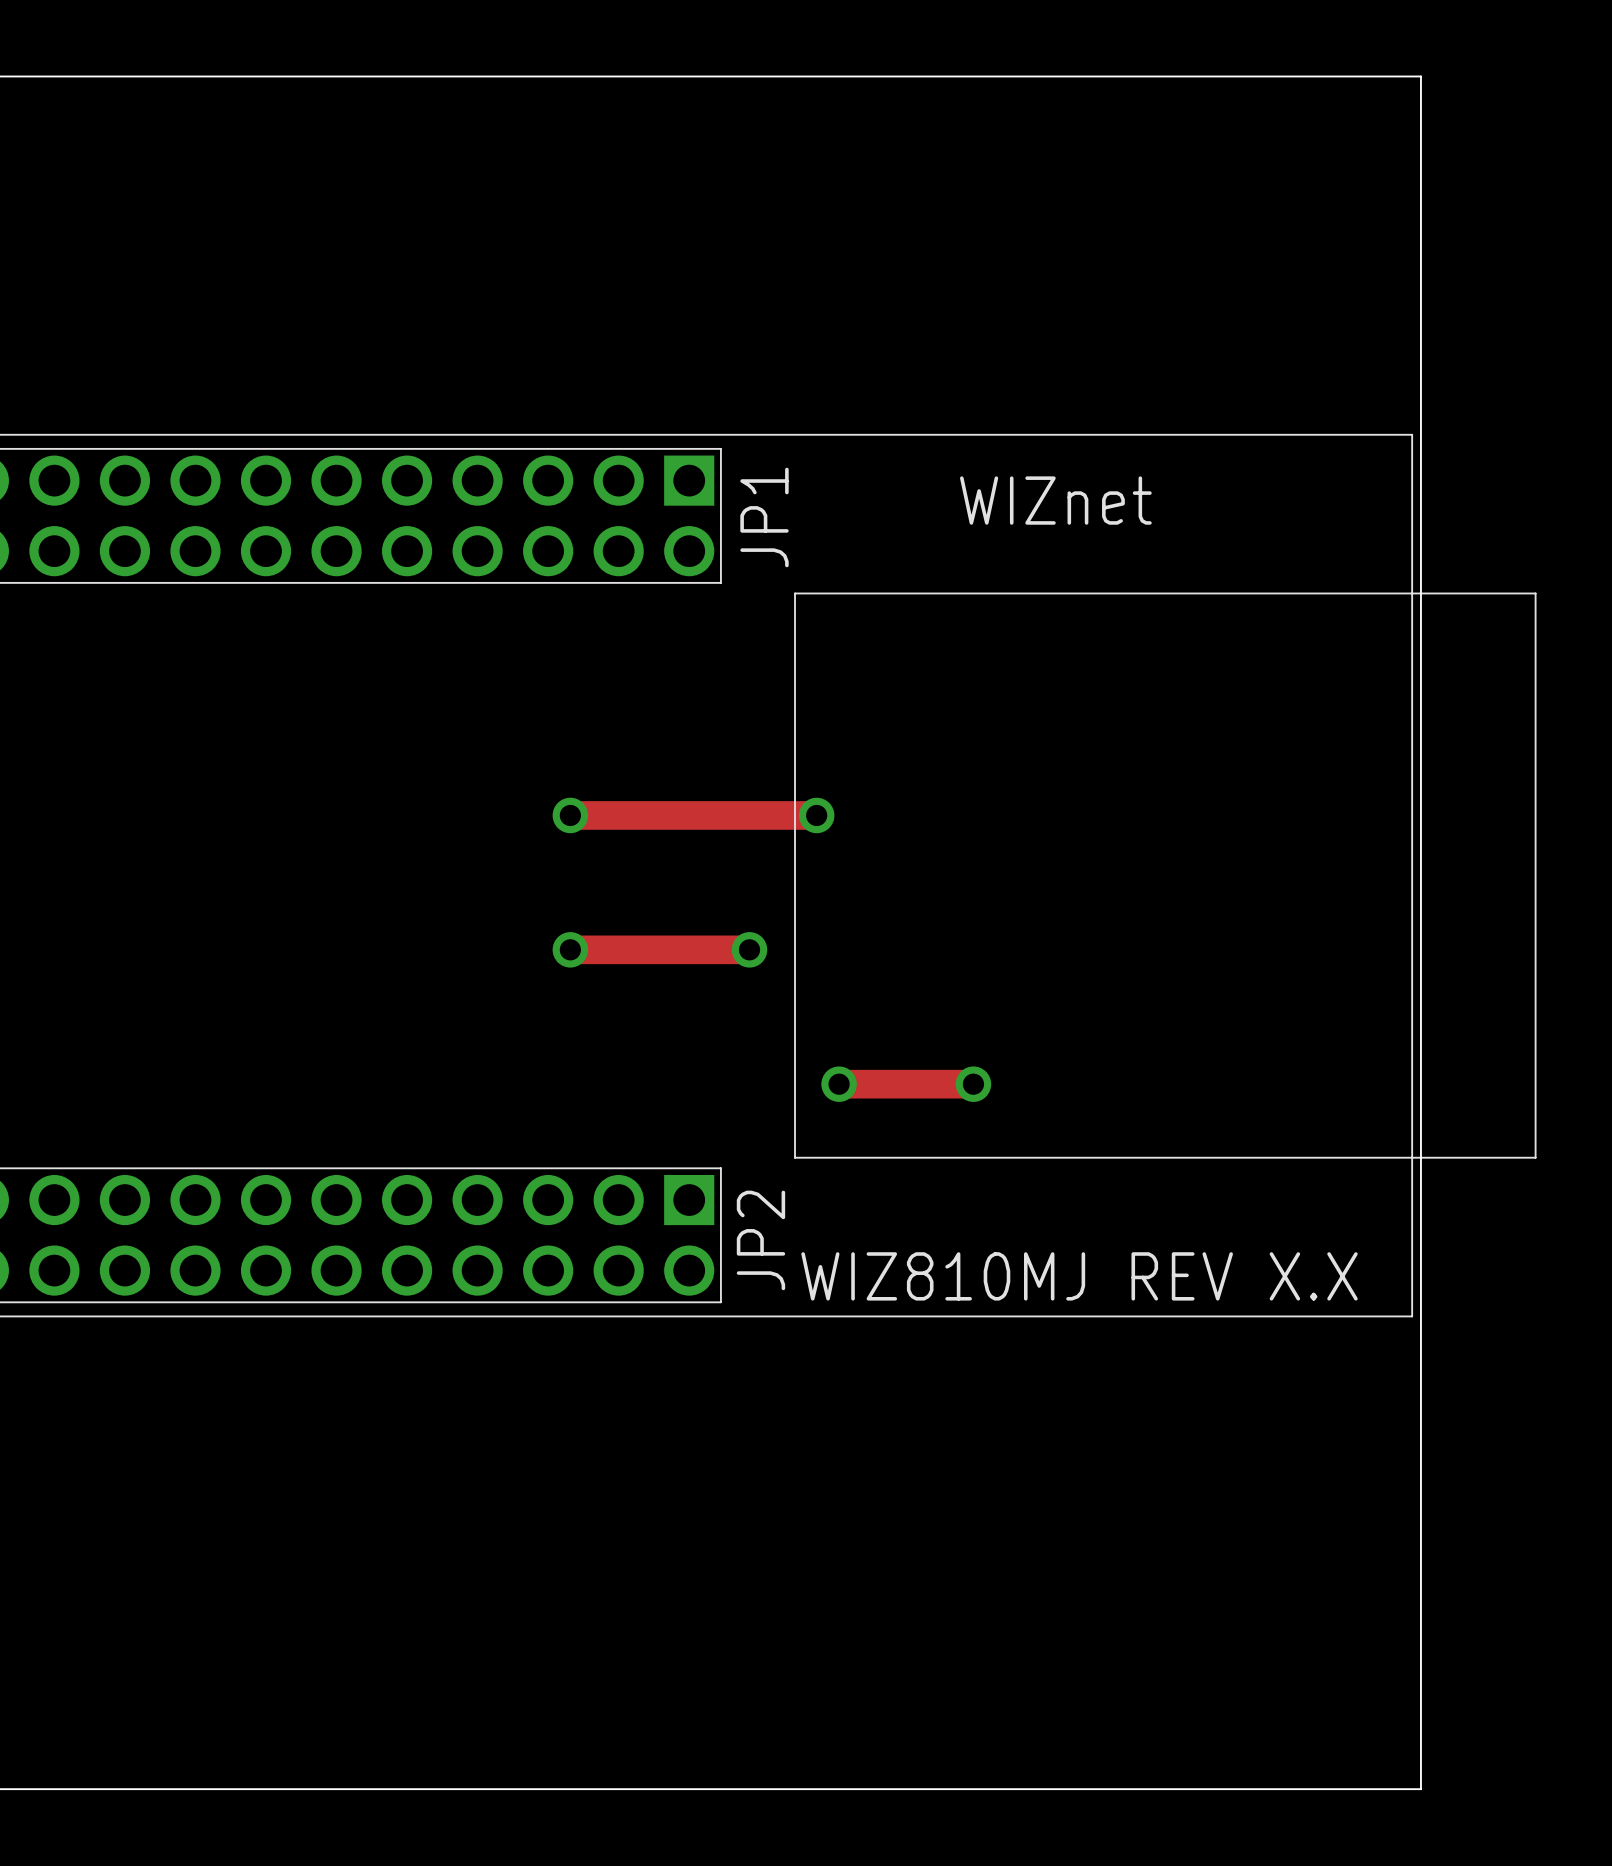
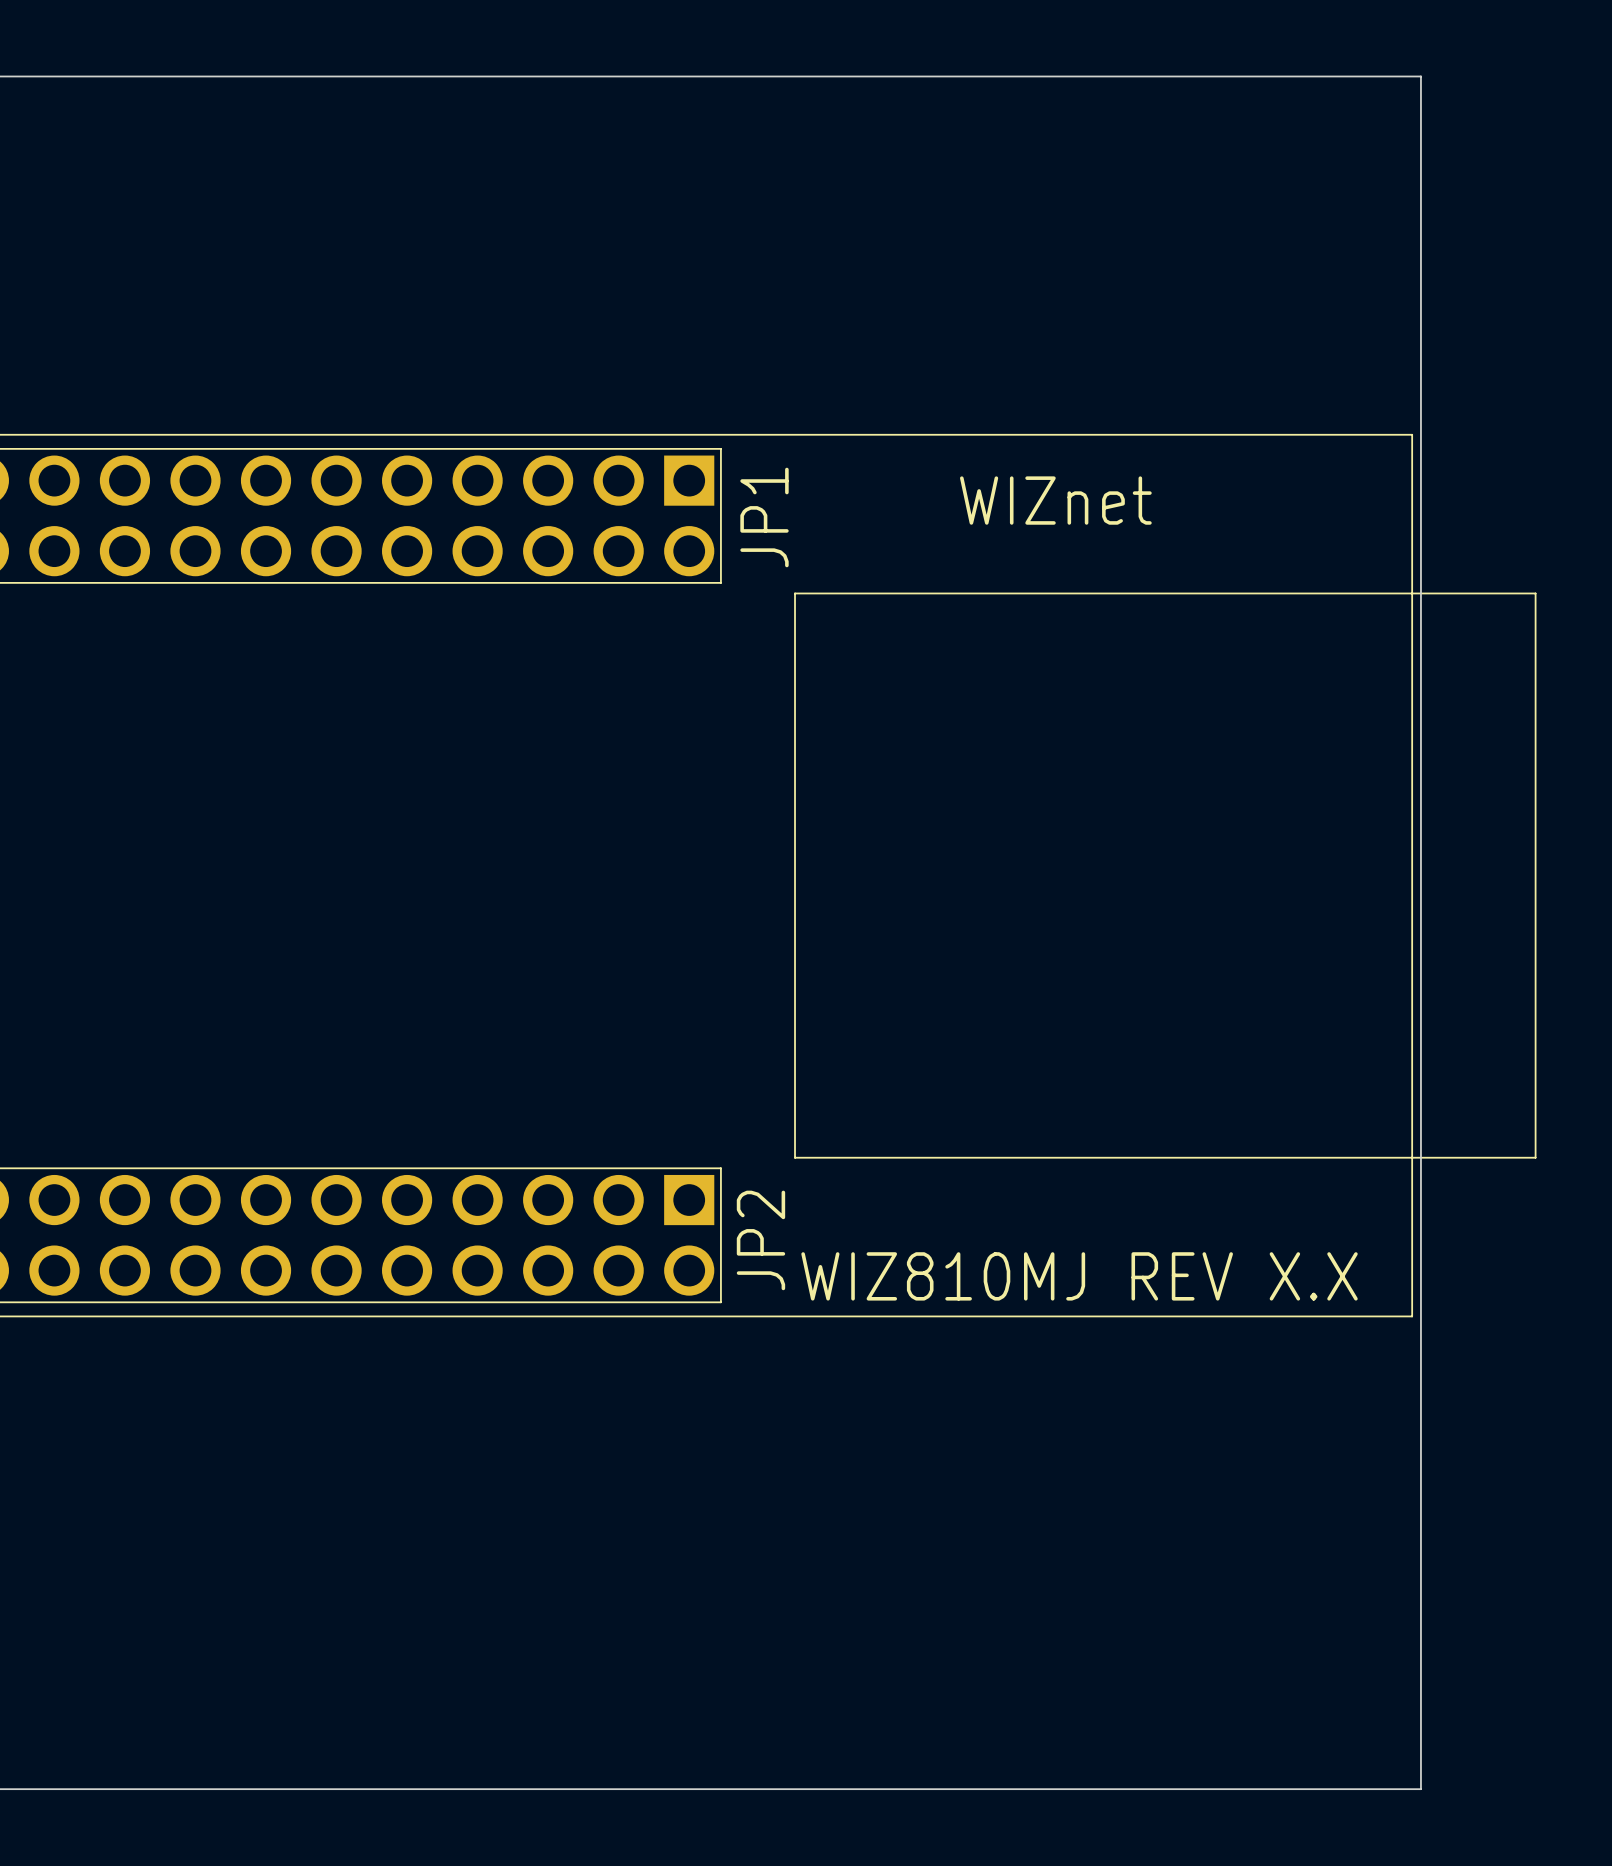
track: (570, 815) (816, 815) -> none
via: (570, 815) -> none
via: (816, 815) -> none
track: (570, 949) (749, 949) -> none
via: (570, 949) -> none
via: (749, 949) -> none
track: (839, 1084) (973, 1084) -> none
via: (839, 1084) -> none
via: (973, 1084) -> none

